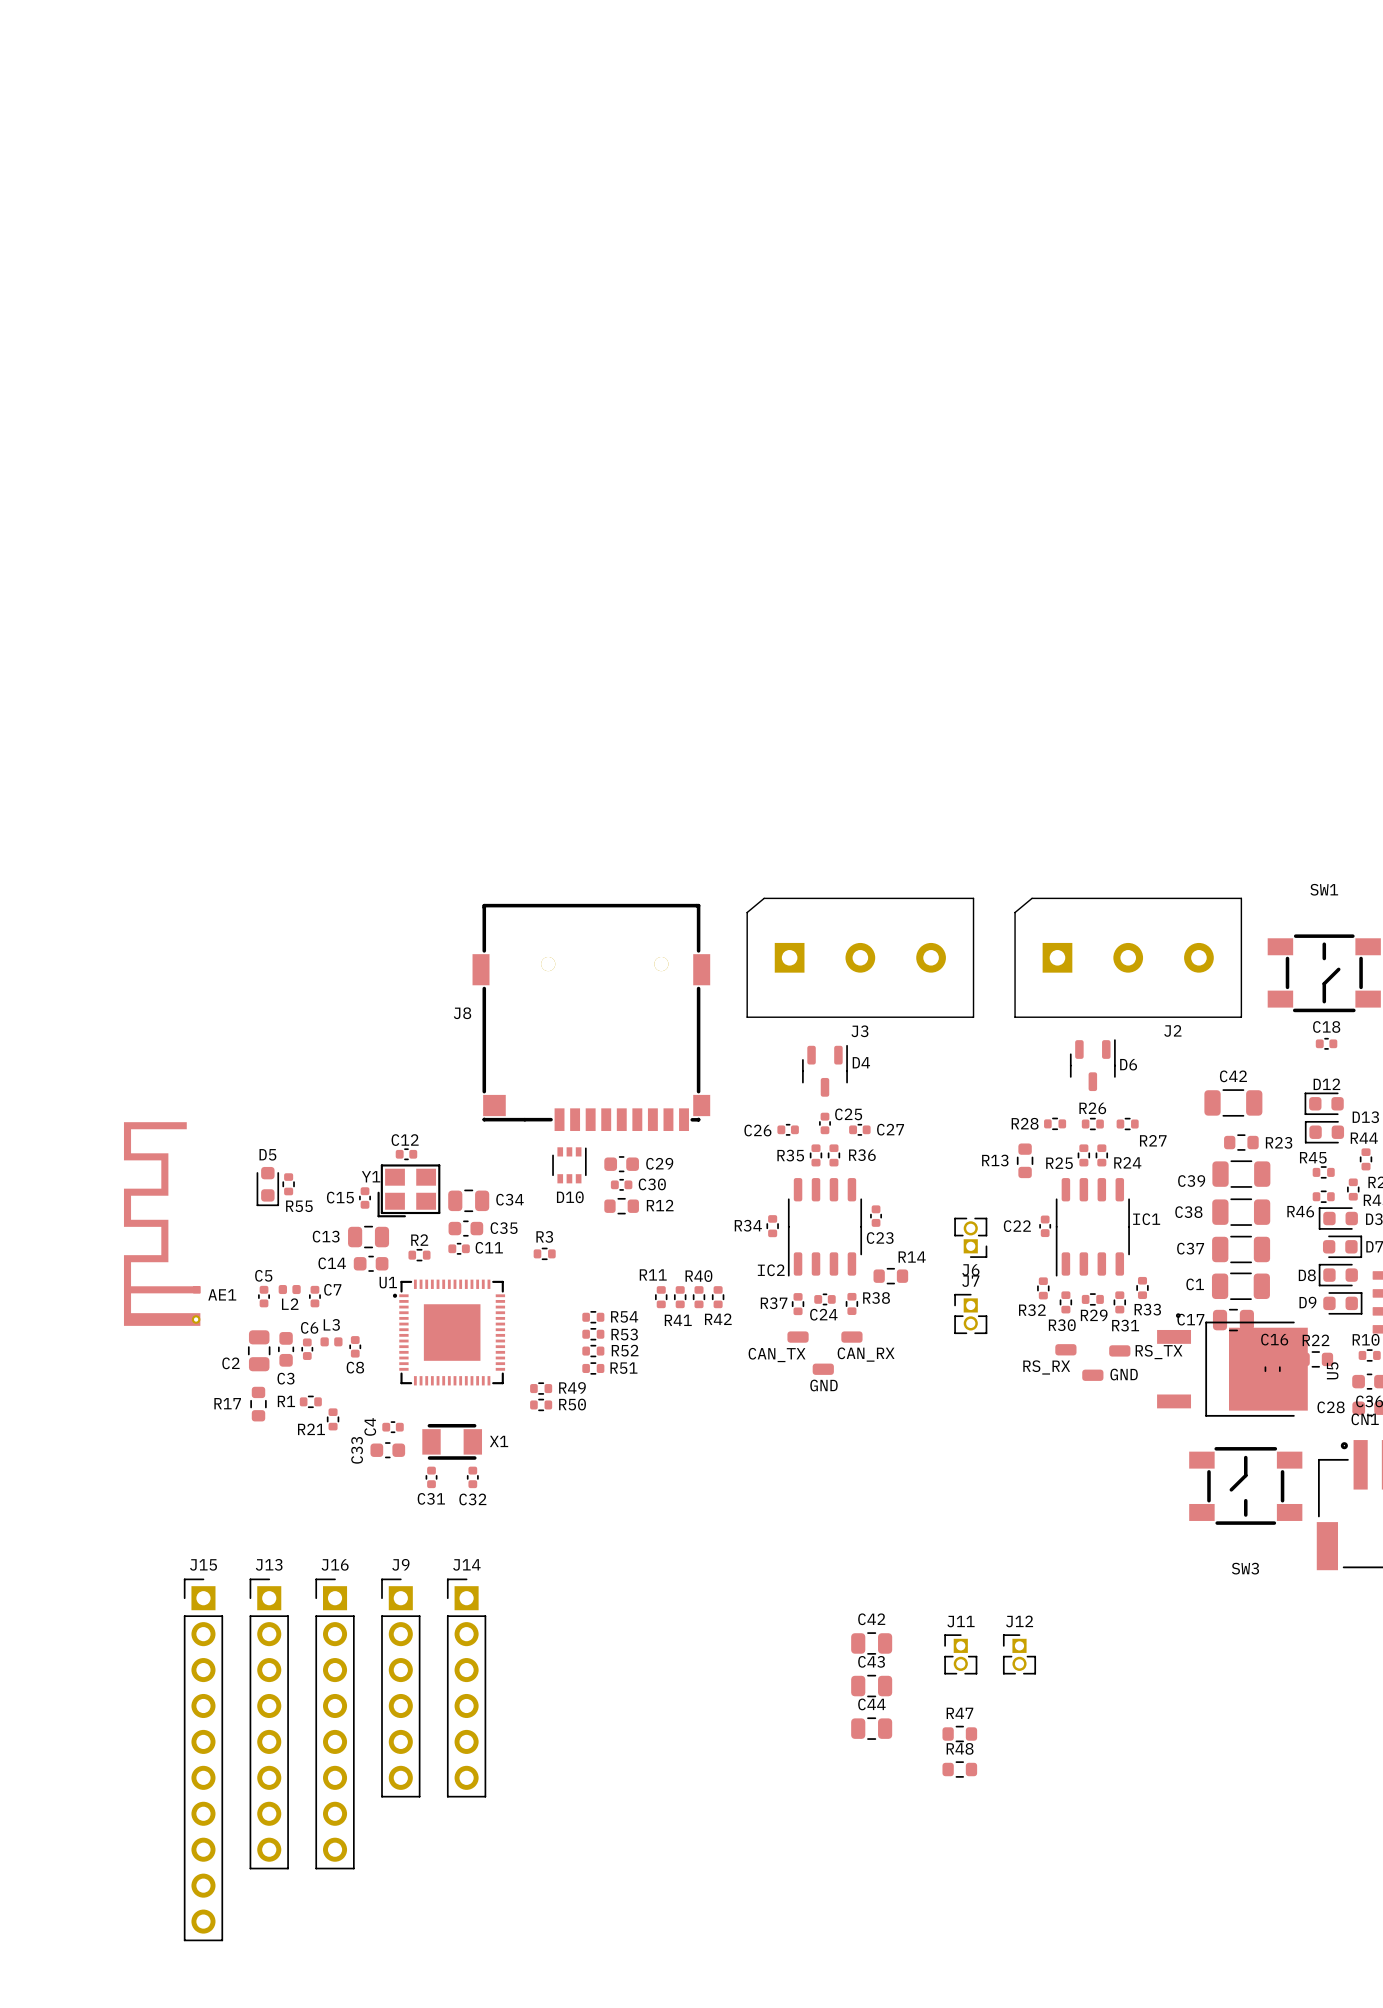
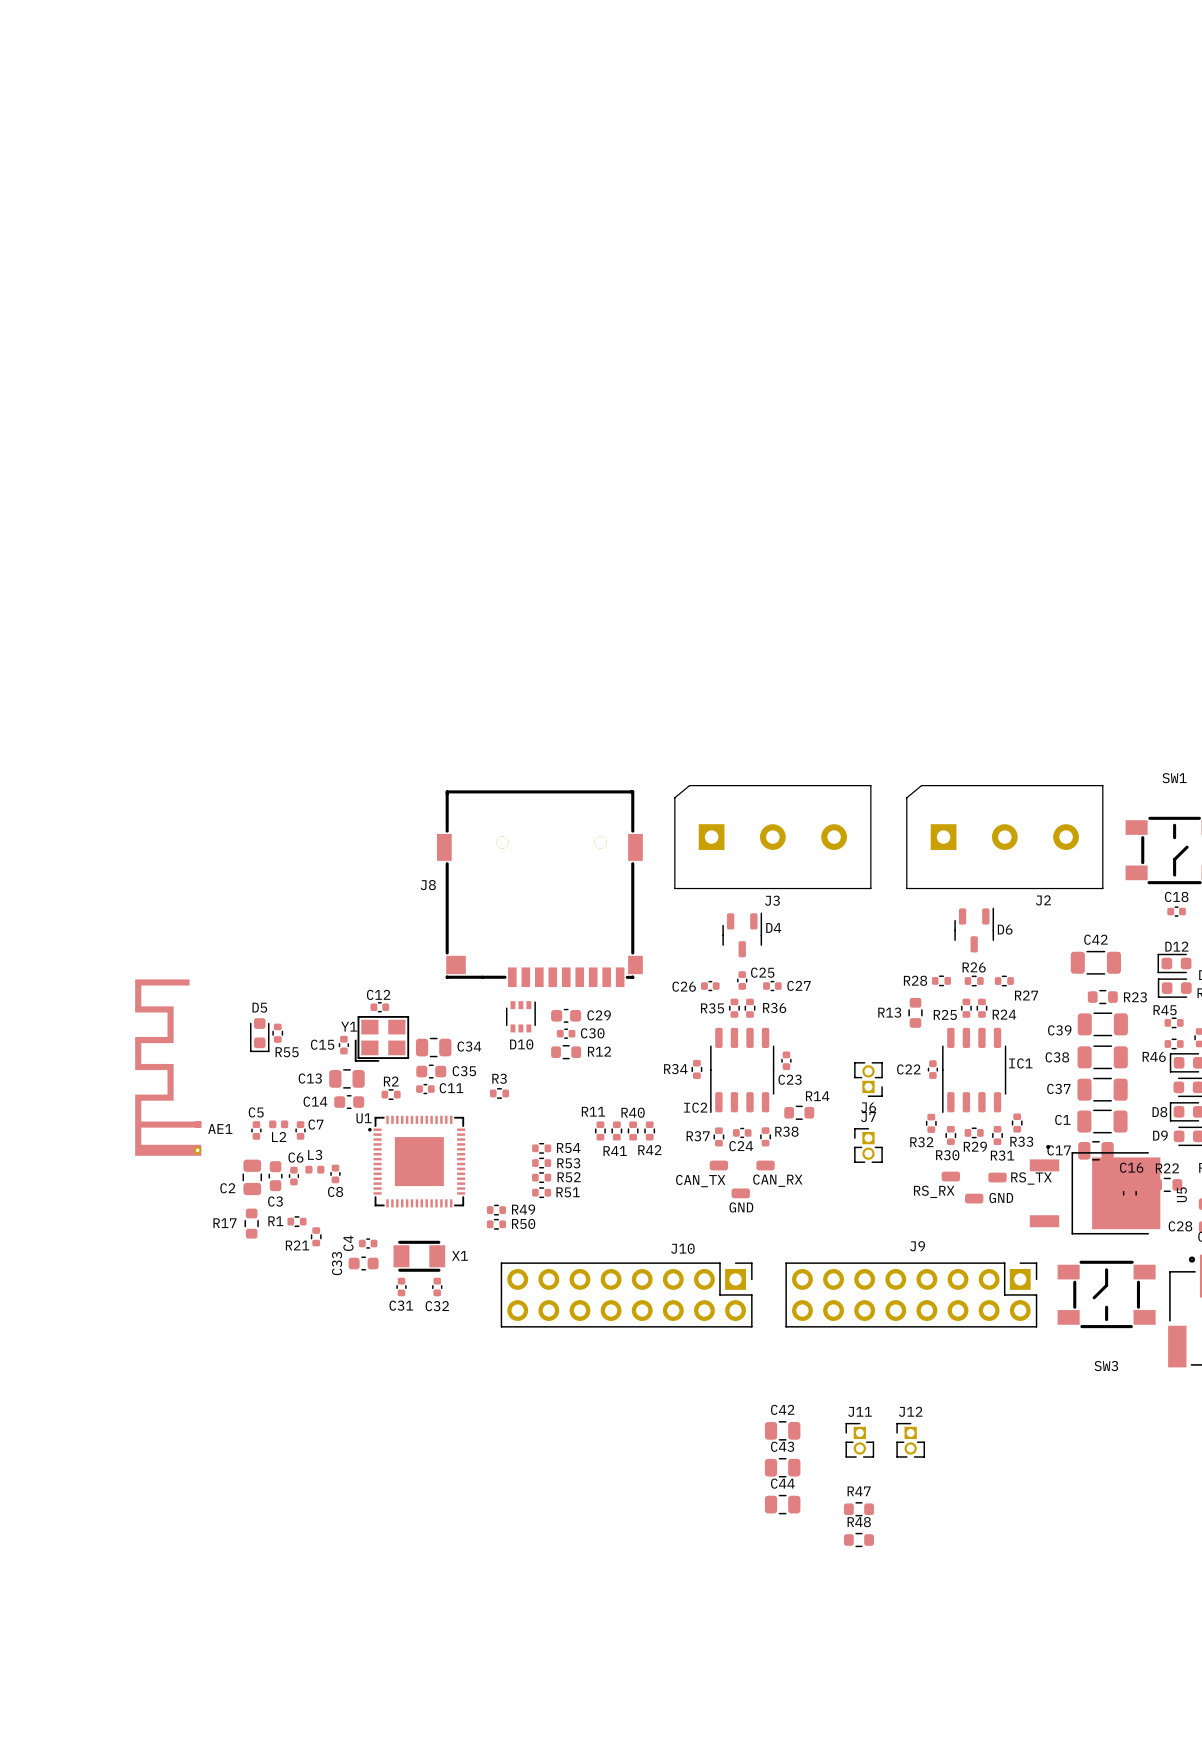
J10: none -> (626, 1294)
J9 name position: J9 (400, 1564) -> J9 (917, 1246)
J9 footprint: [381, 1578, 421, 1798] -> [785, 1262, 1038, 1328]
J14: (466, 1688) -> none
J13: (269, 1723) -> none
J16: (335, 1723) -> none
J15: (203, 1759) -> none

